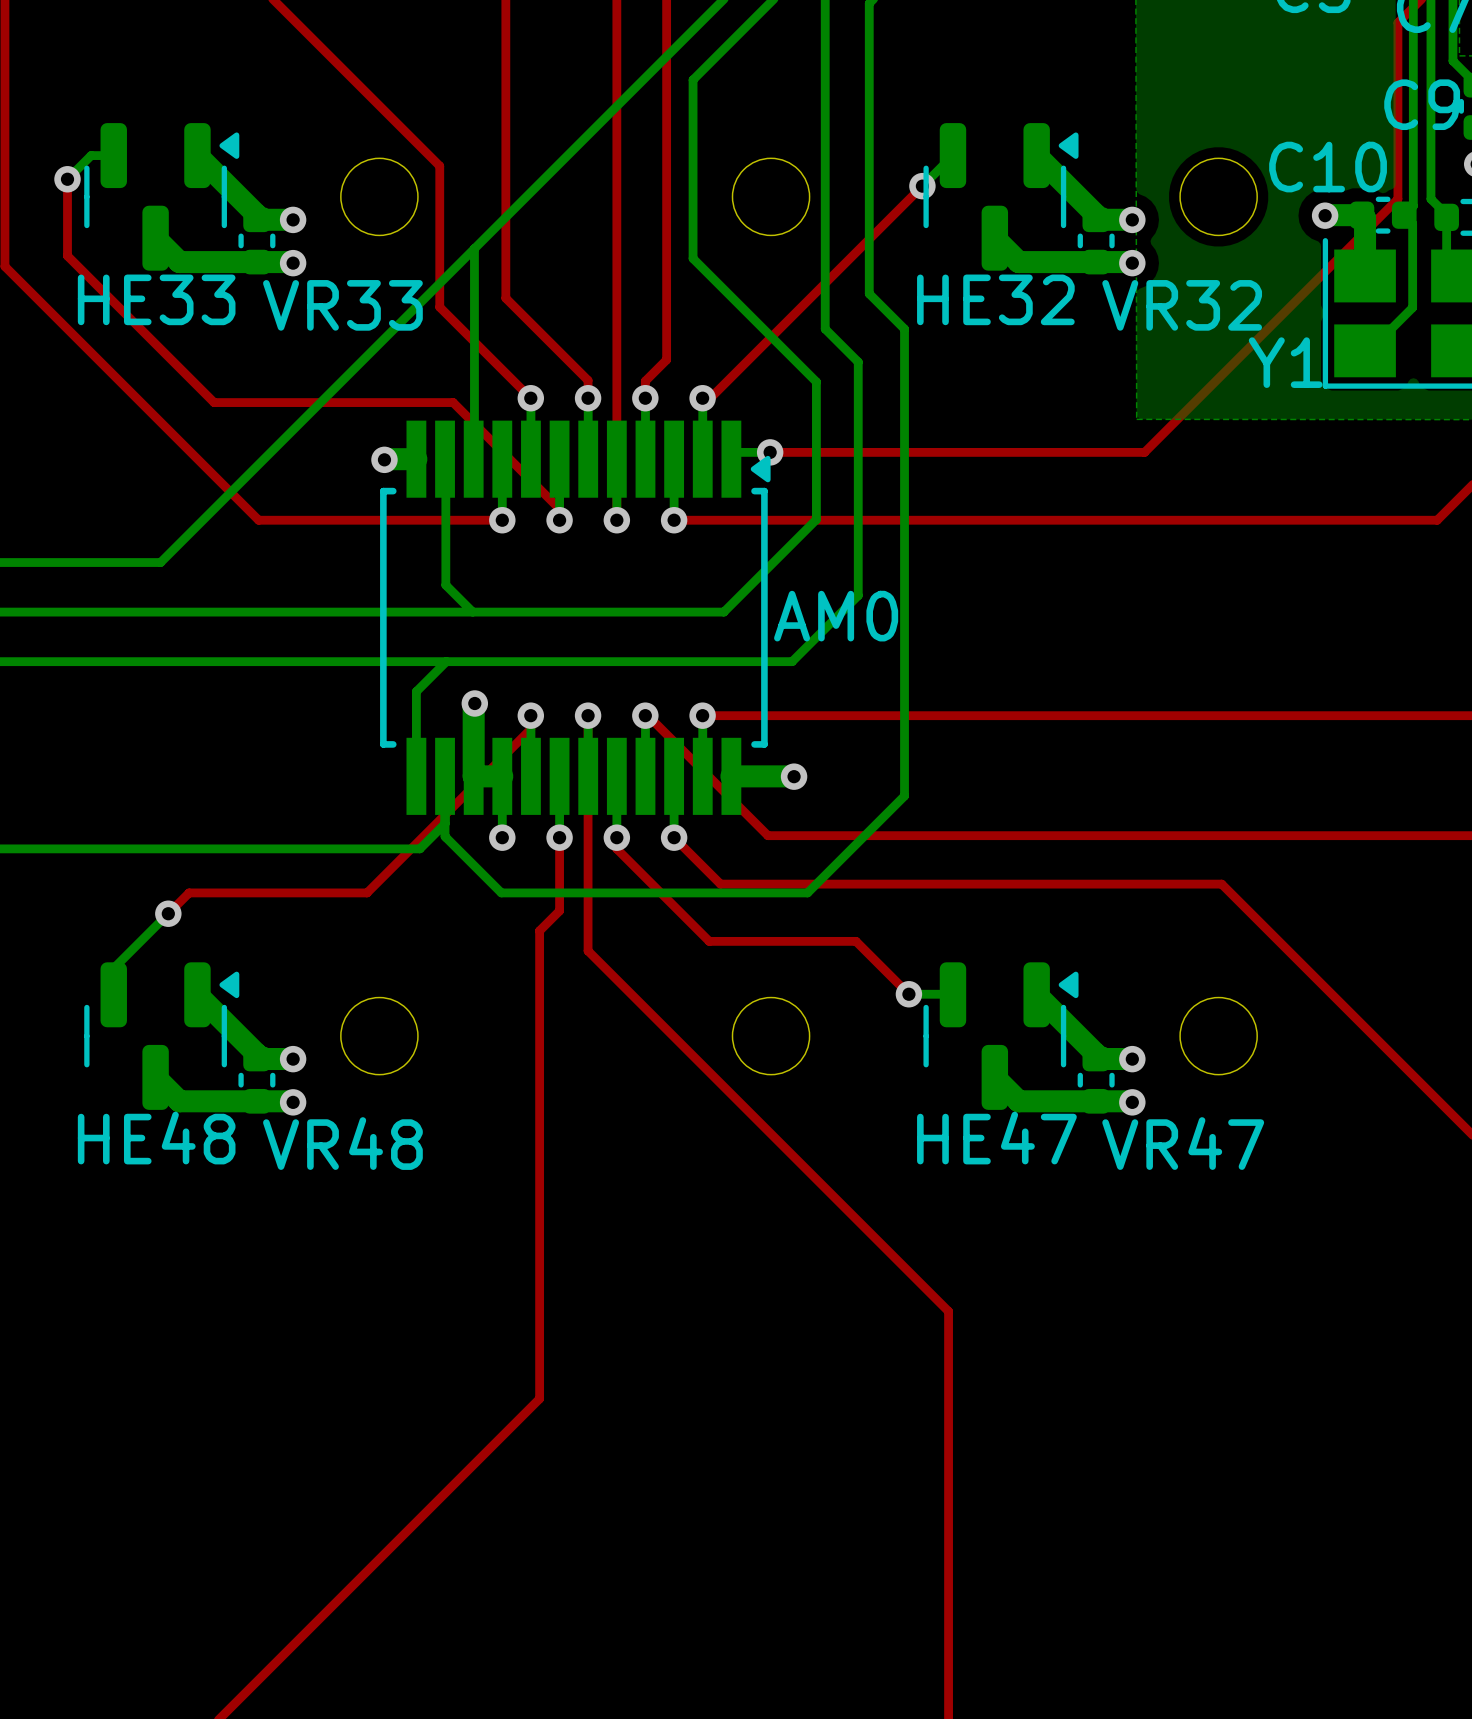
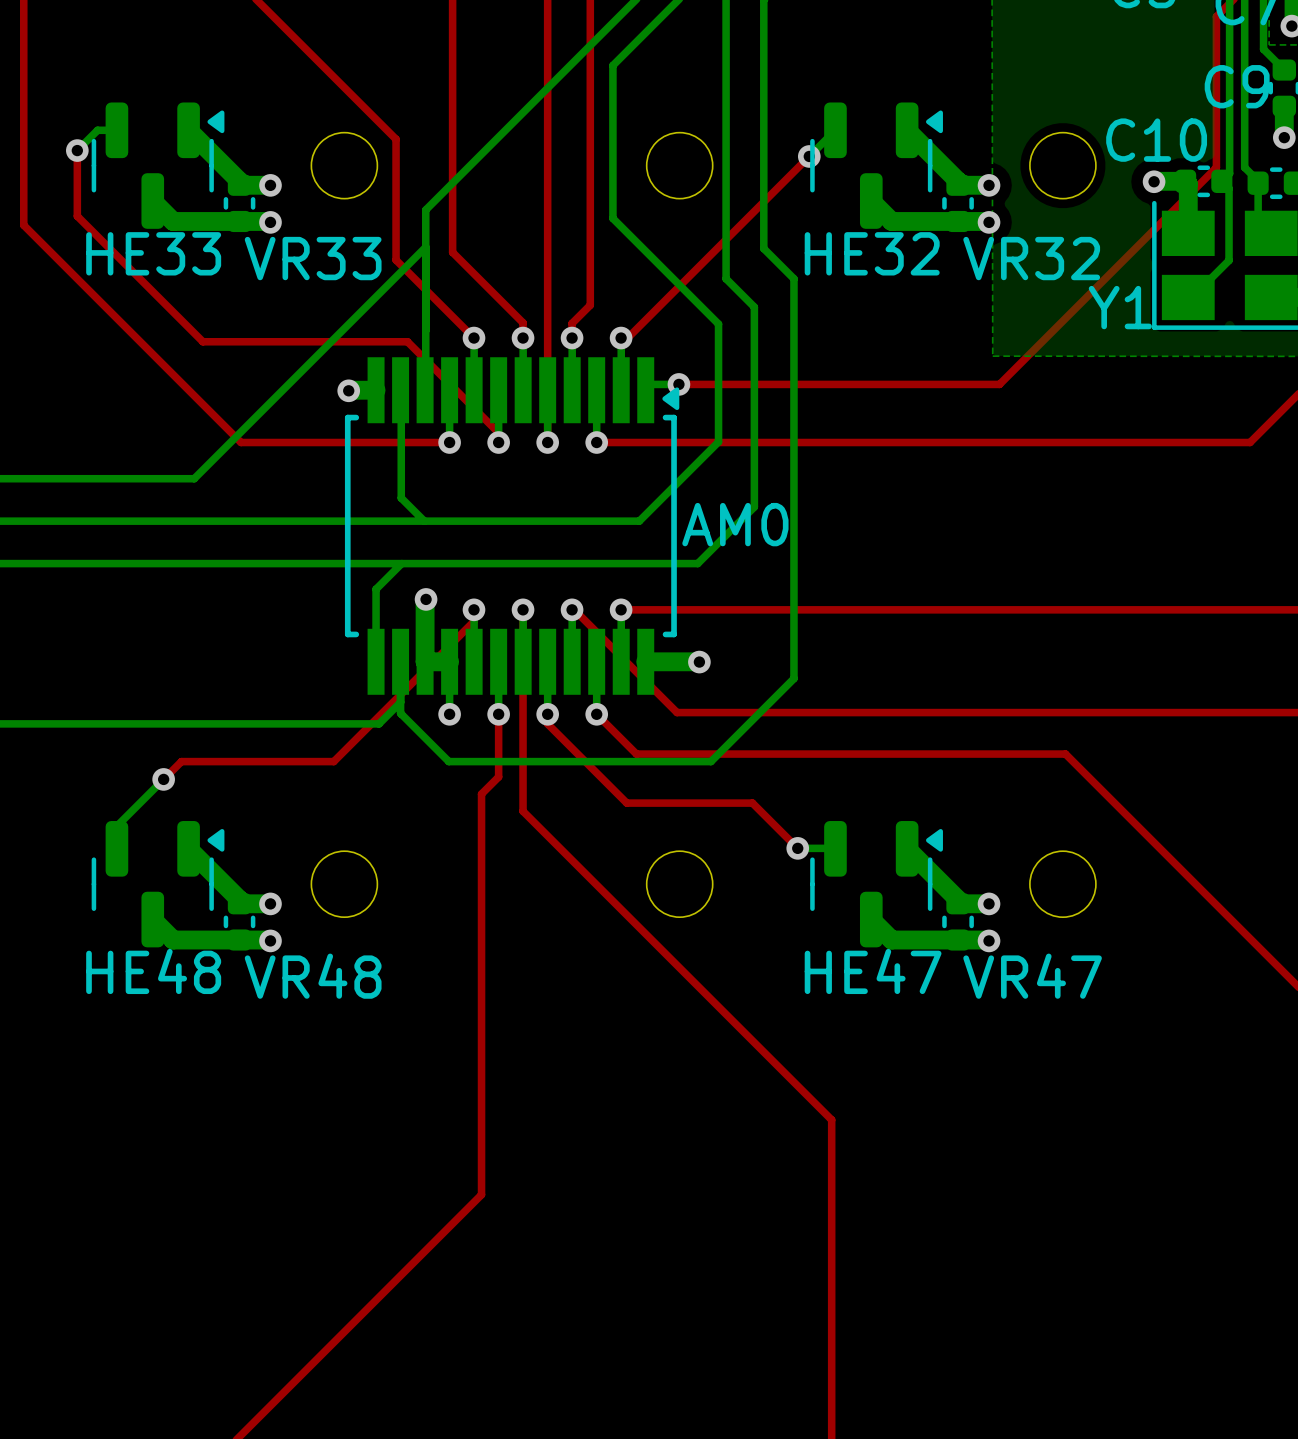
bottom track: (474, 248) (160, 562) -> (425, 247) (194, 478) (157, 478)

